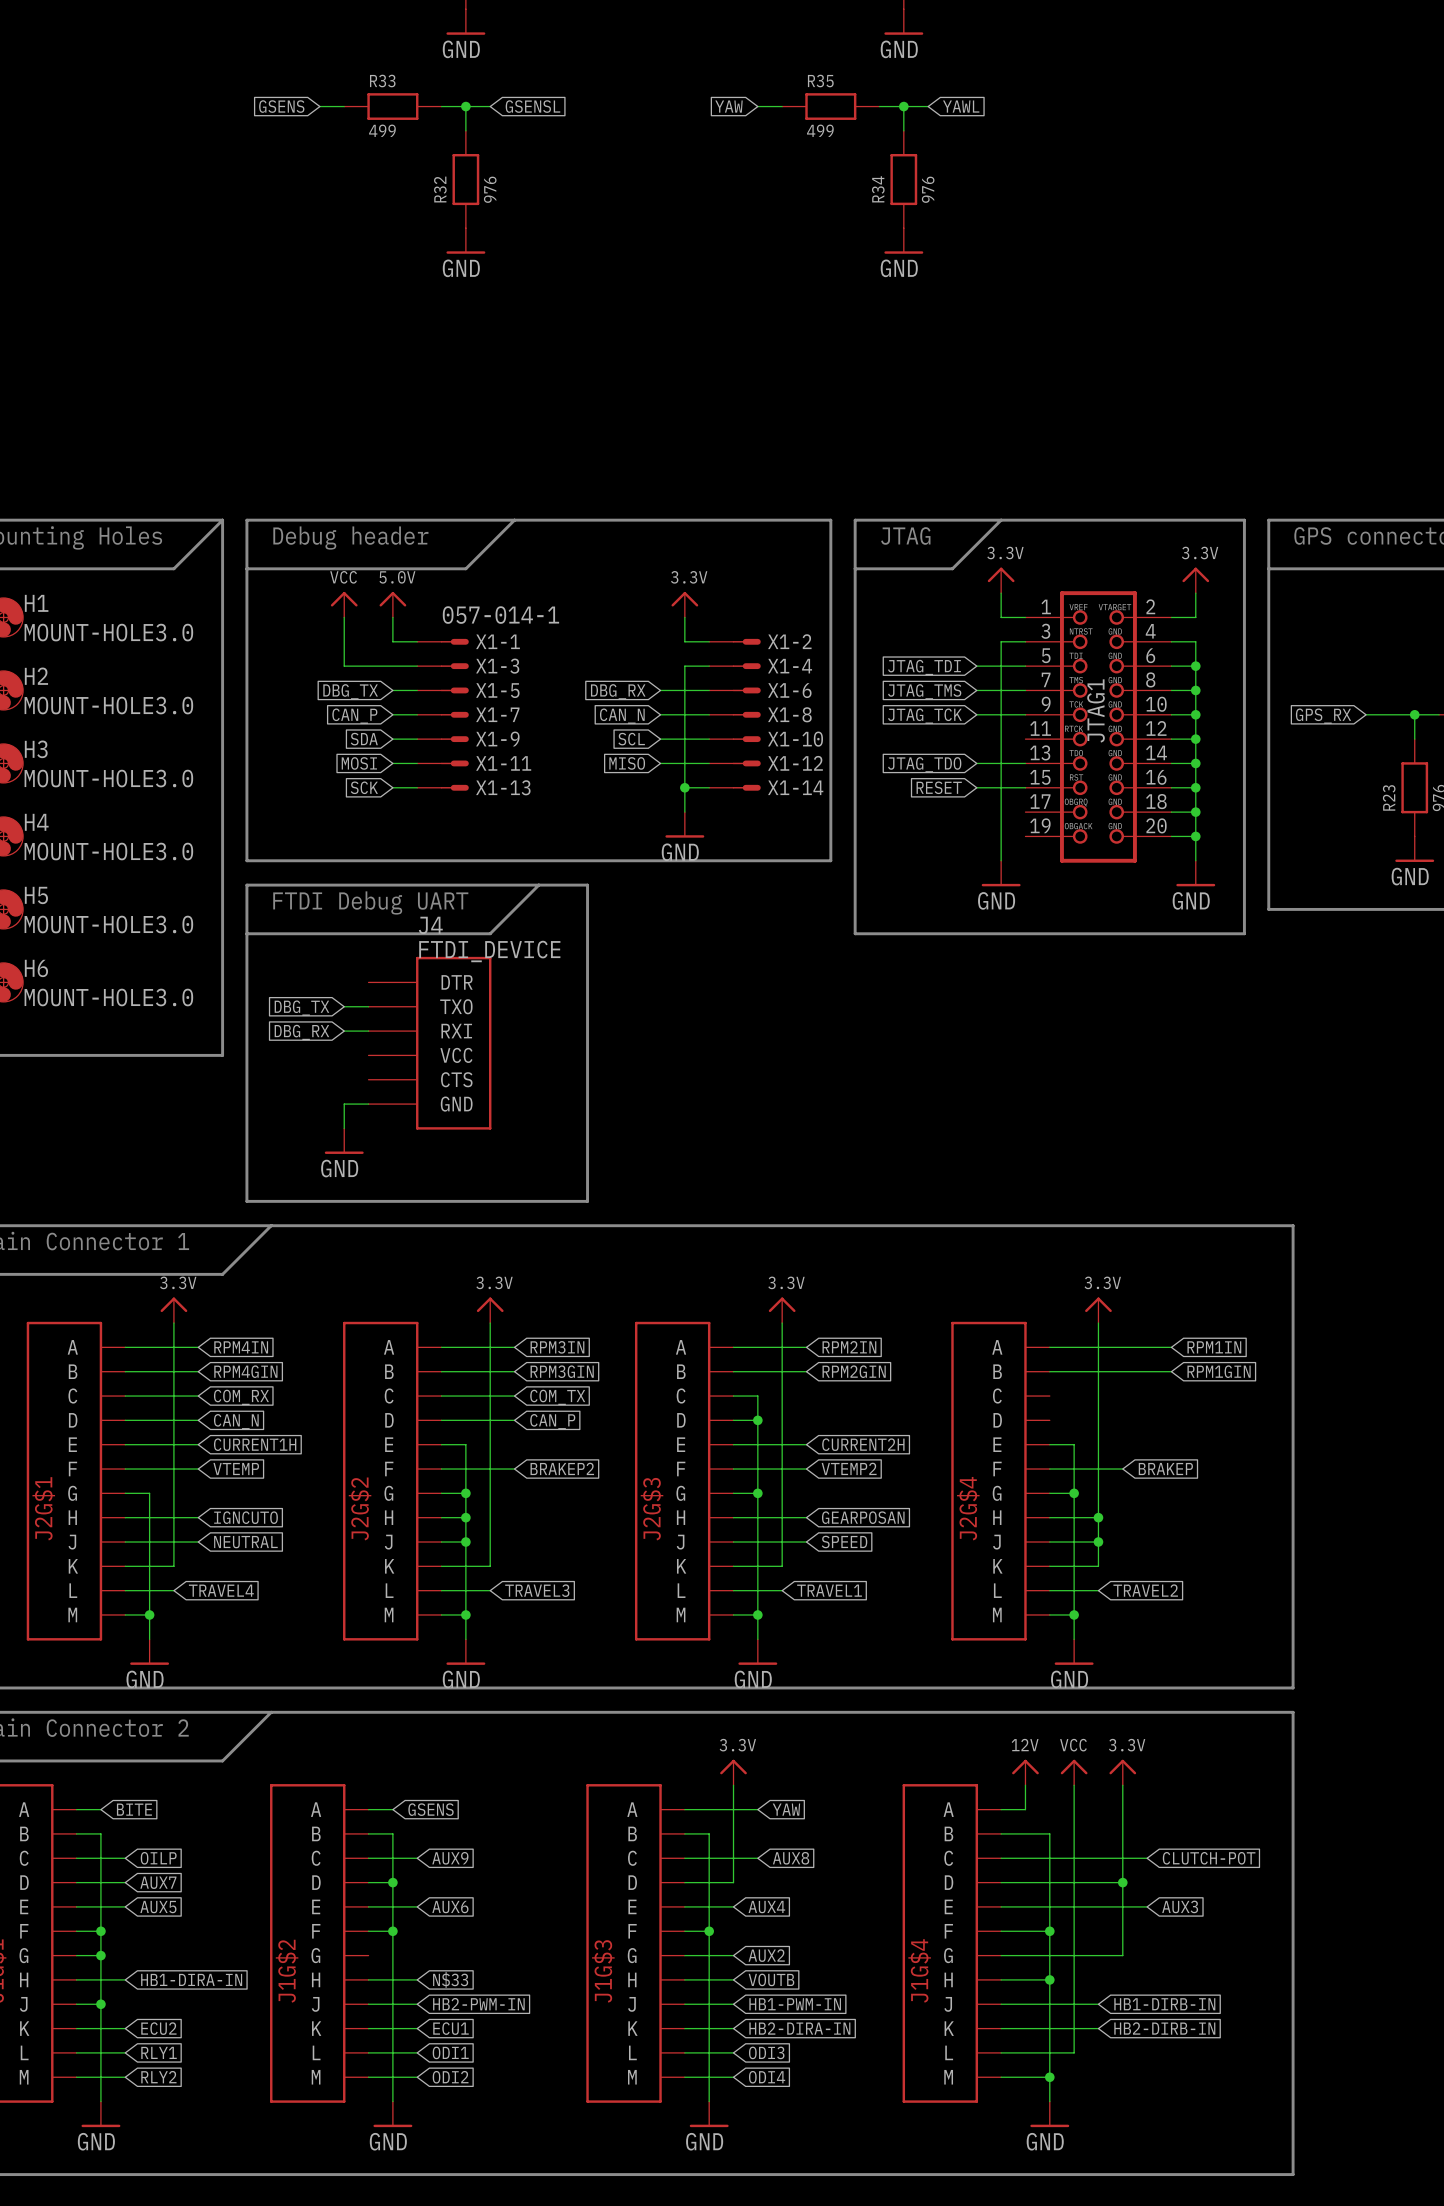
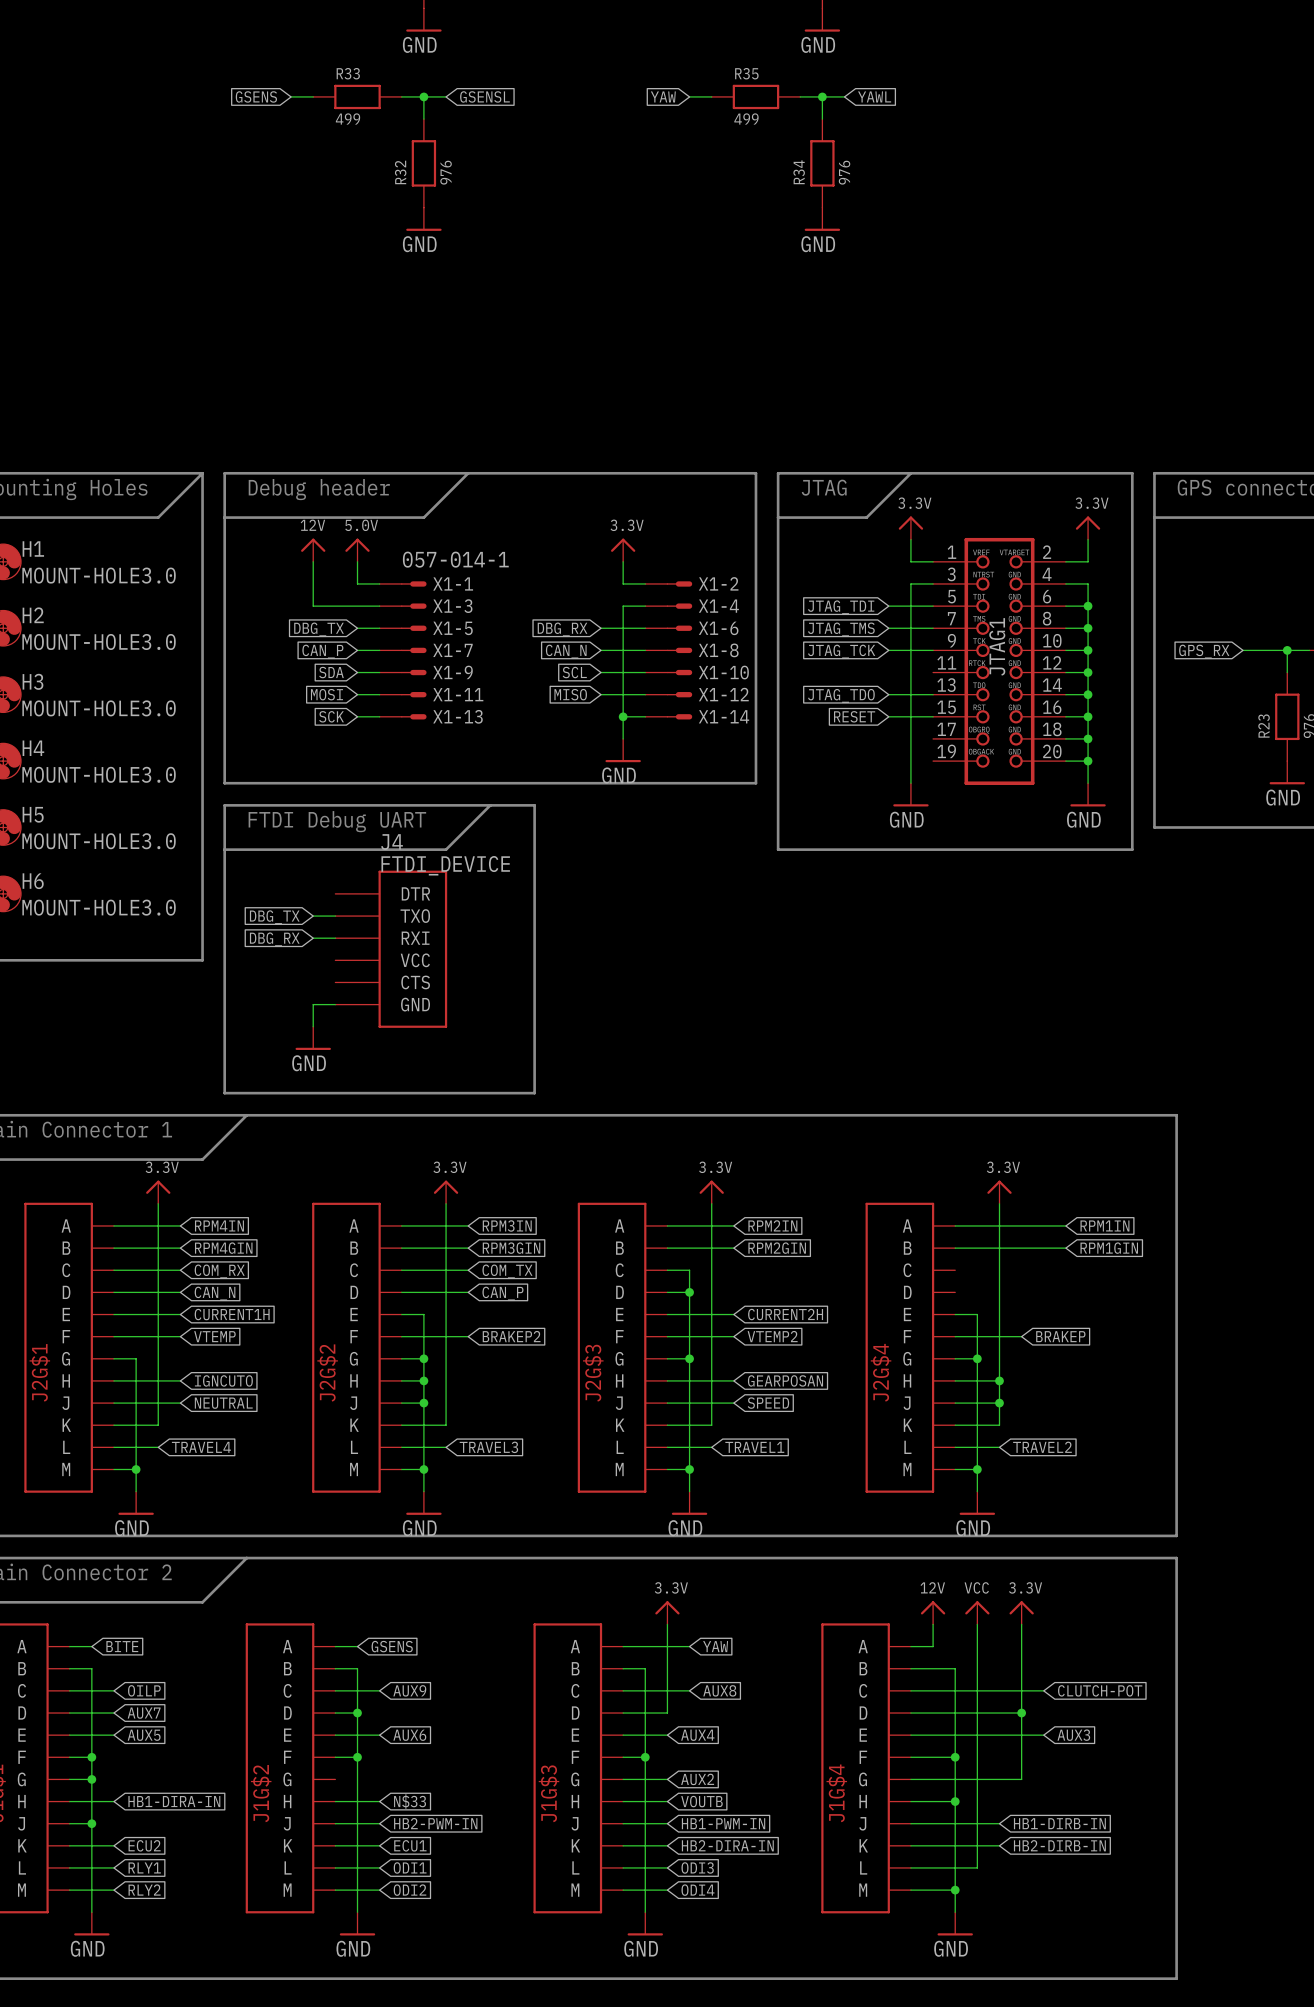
power symbol: VCC (344, 604) -> 12V (313, 550)

